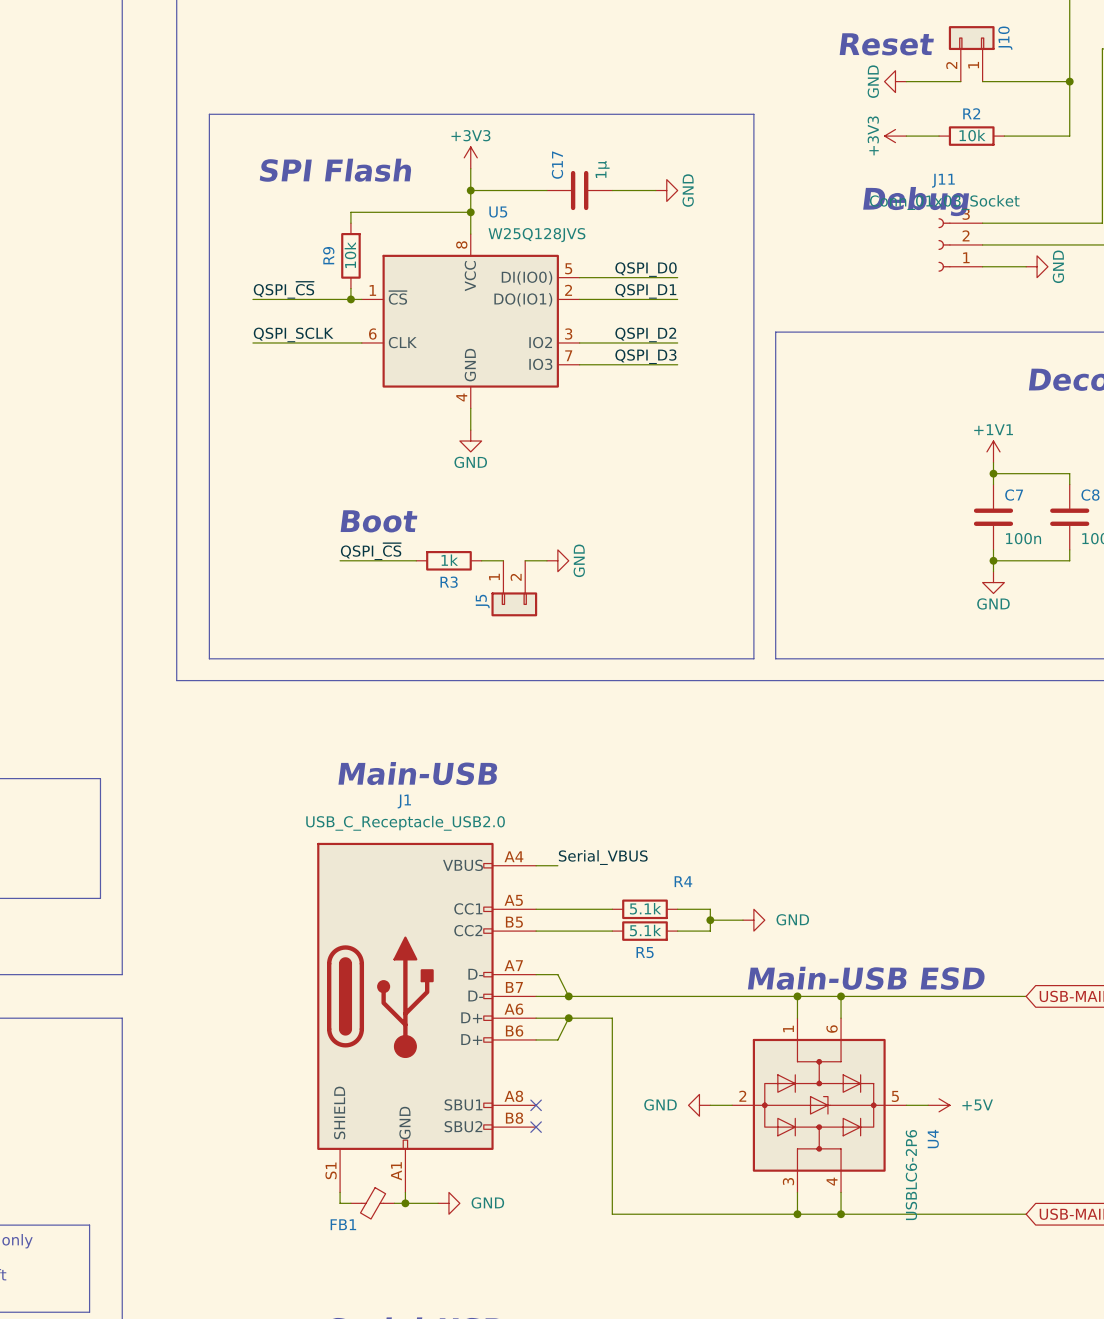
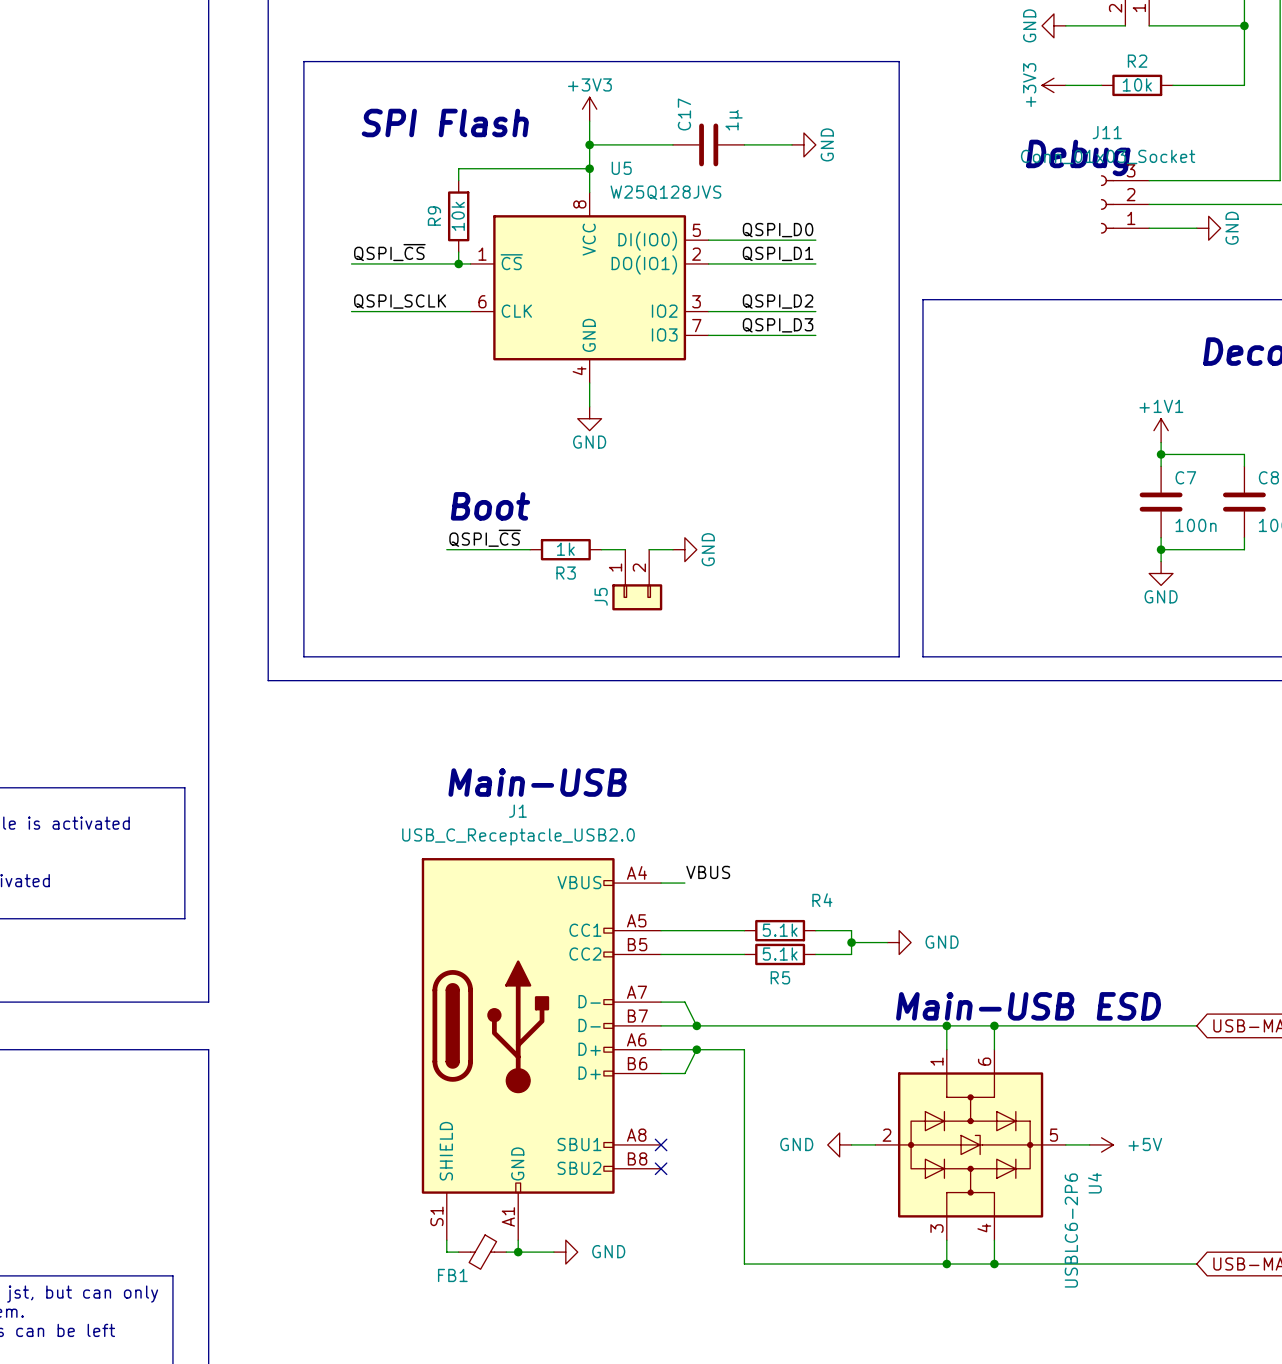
label: Serial_VBUS (603, 857) -> VBUS (708, 872)

